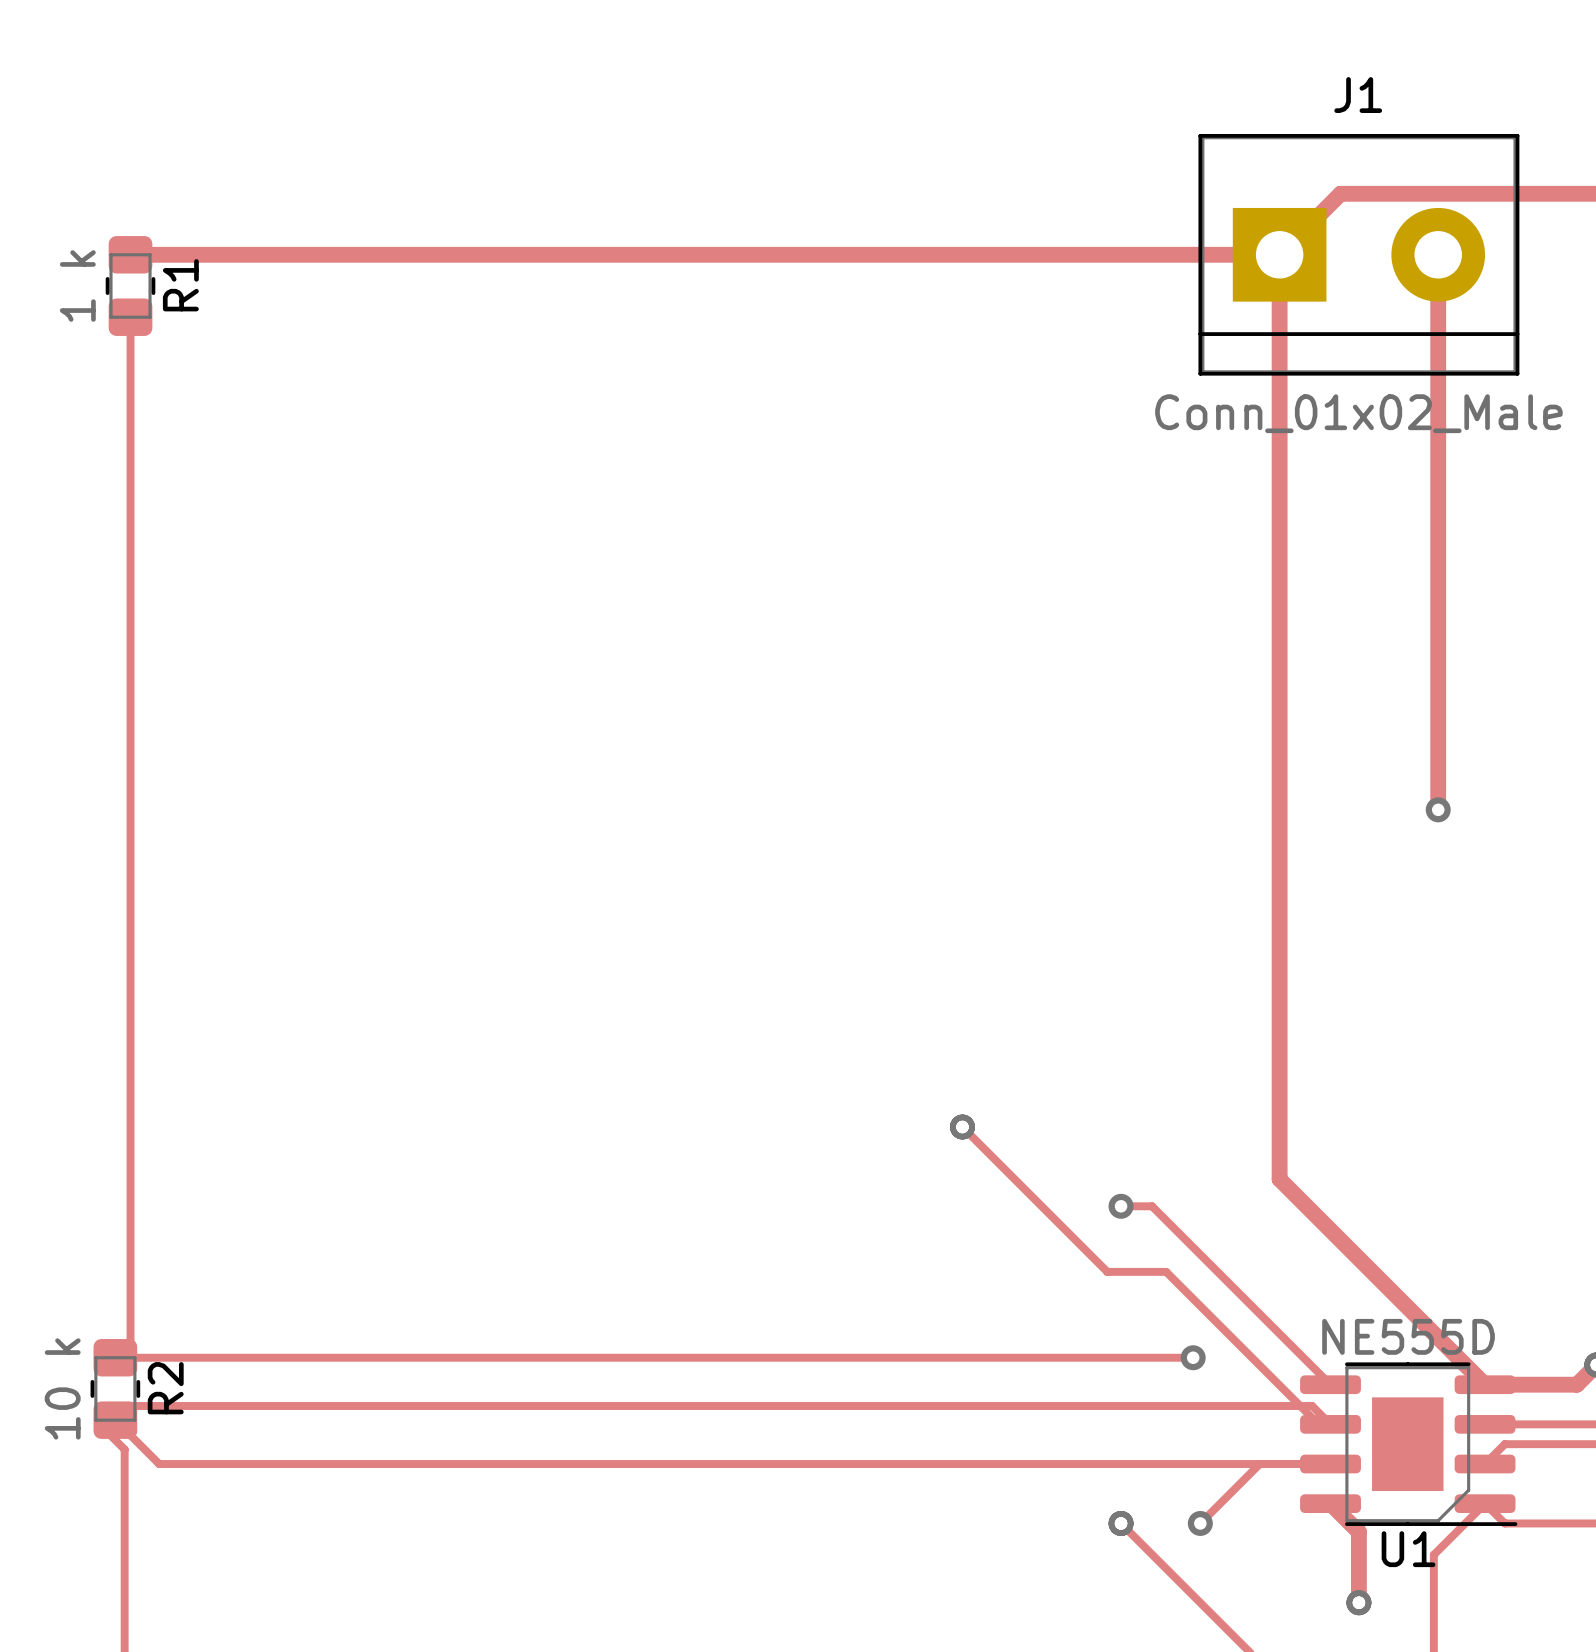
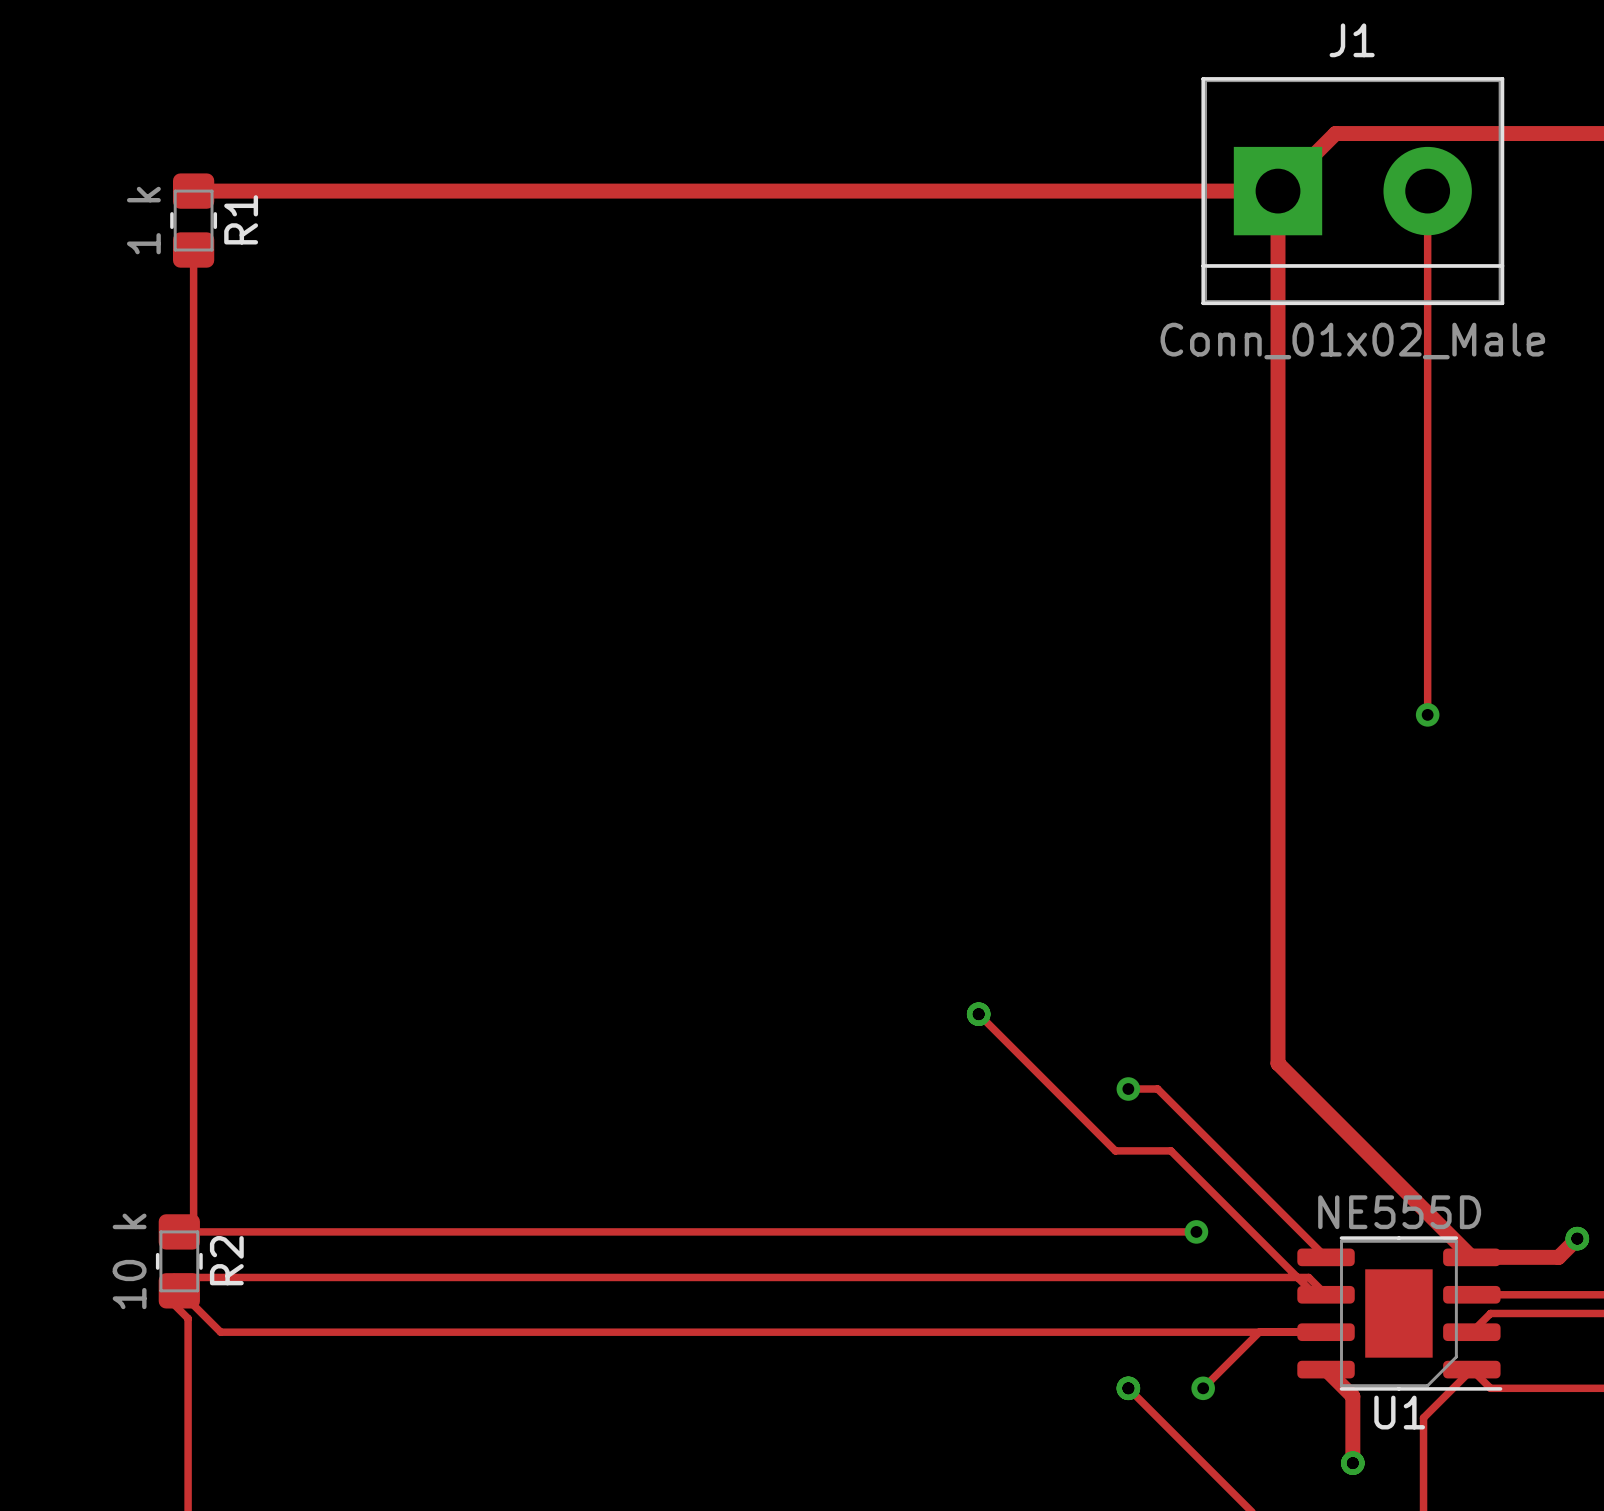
track width: thick (1438, 254) (1438, 809) -> thin (1427, 191) (1427, 714)

